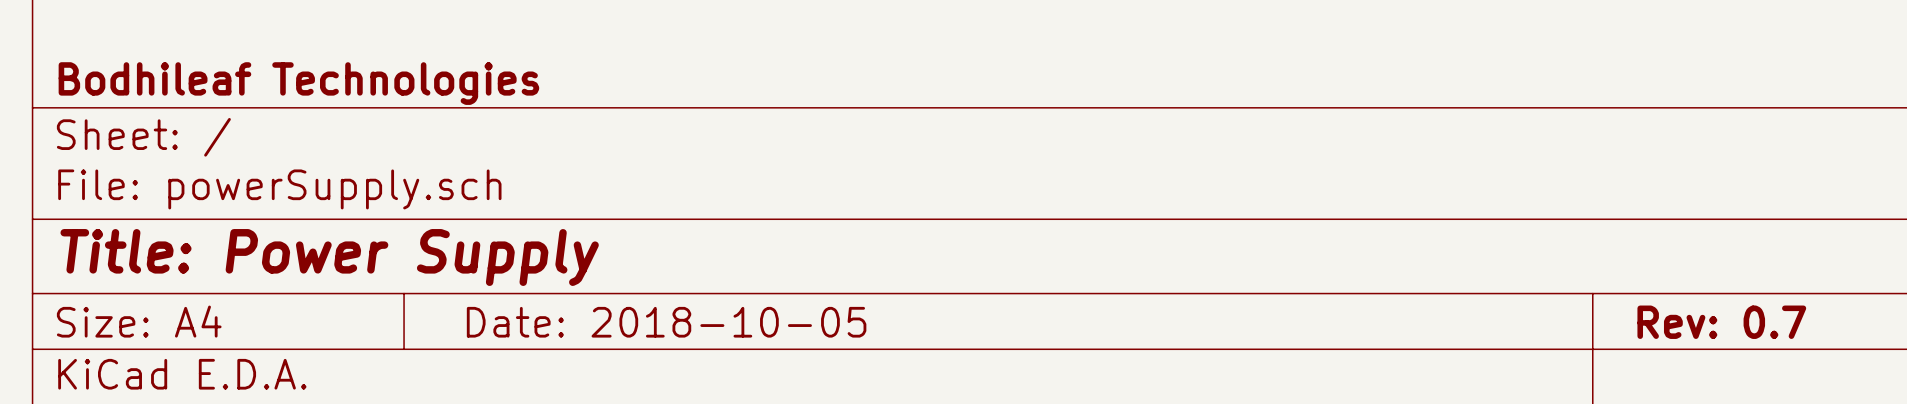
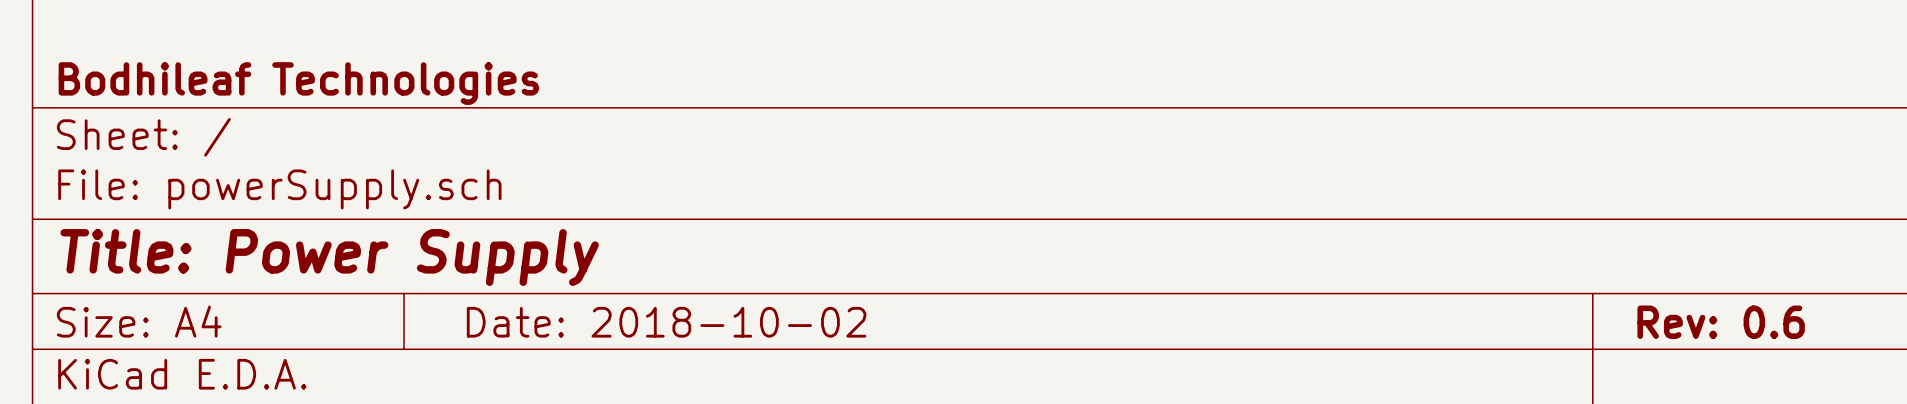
title block: Date: 2018-10-05 (666, 322) -> Date: 2018-10-02 (666, 322)
title block: Rev: 0.7 (1721, 322) -> Rev: 0.6 (1721, 322)

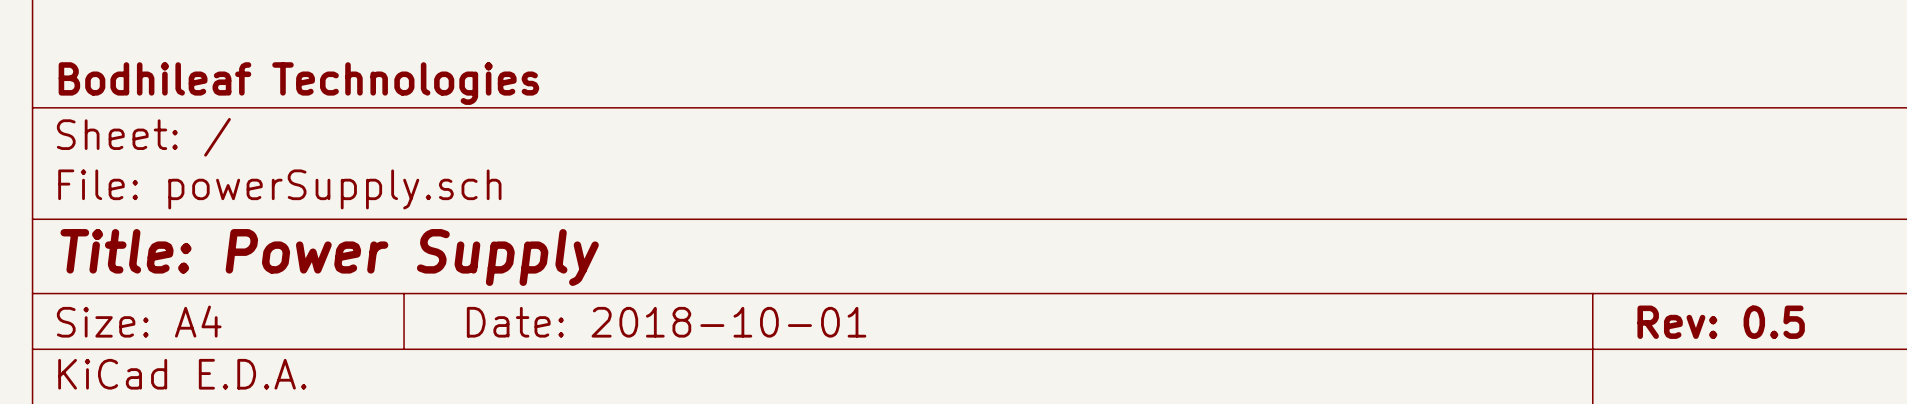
title block: Date: 2018-10-02 (666, 322) -> Date: 2018-10-01 (666, 322)
title block: Rev: 0.6 (1721, 322) -> Rev: 0.5 (1721, 322)

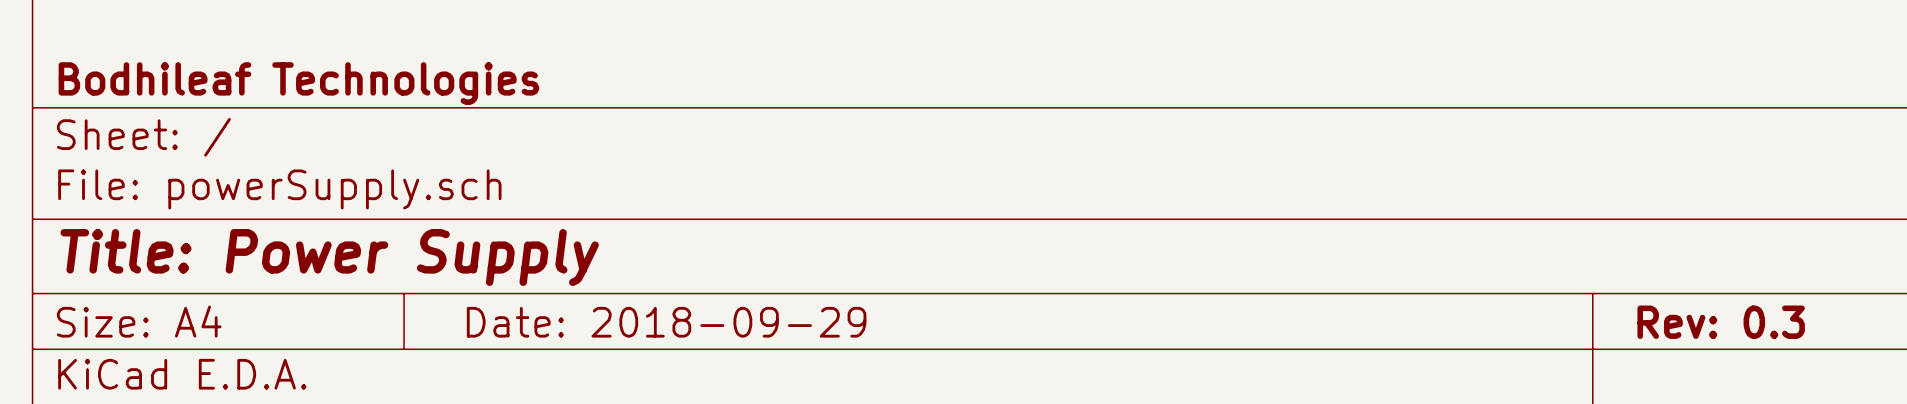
title block: Date: 2018-10-01 (666, 322) -> Date: 2018-09-29 (666, 322)
title block: Rev: 0.5 (1721, 322) -> Rev: 0.3 (1721, 322)

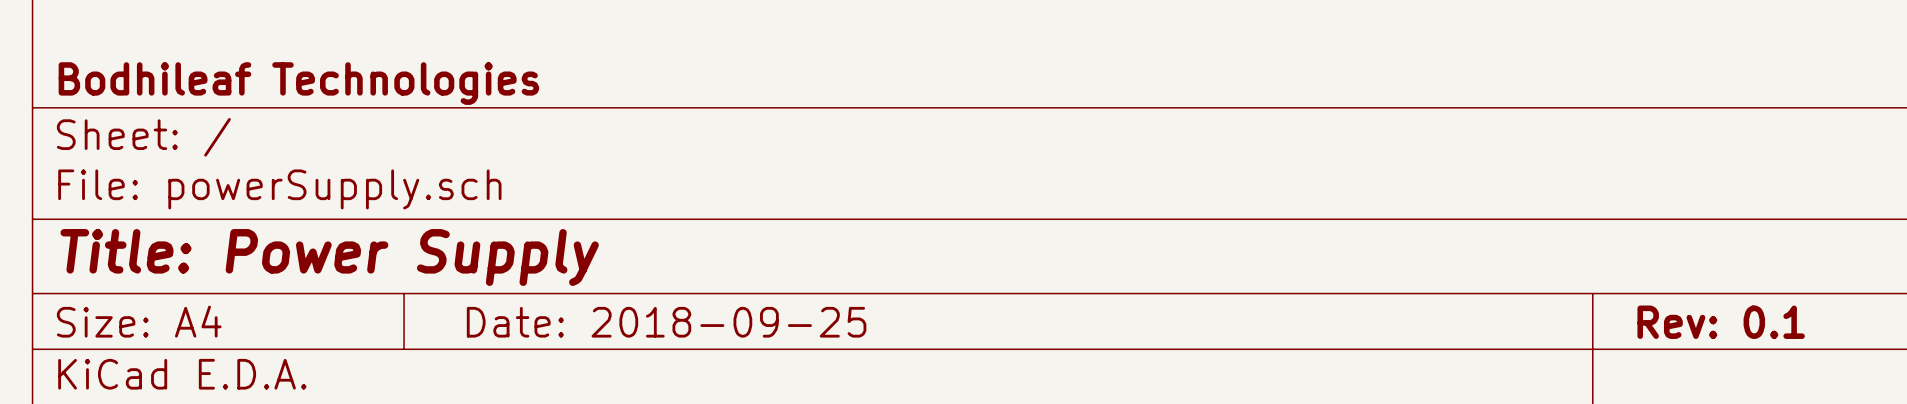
title block: Date: 2018-09-29 (666, 322) -> Date: 2018-09-25 (666, 322)
title block: Rev: 0.3 (1721, 322) -> Rev: 0.1 (1721, 322)

